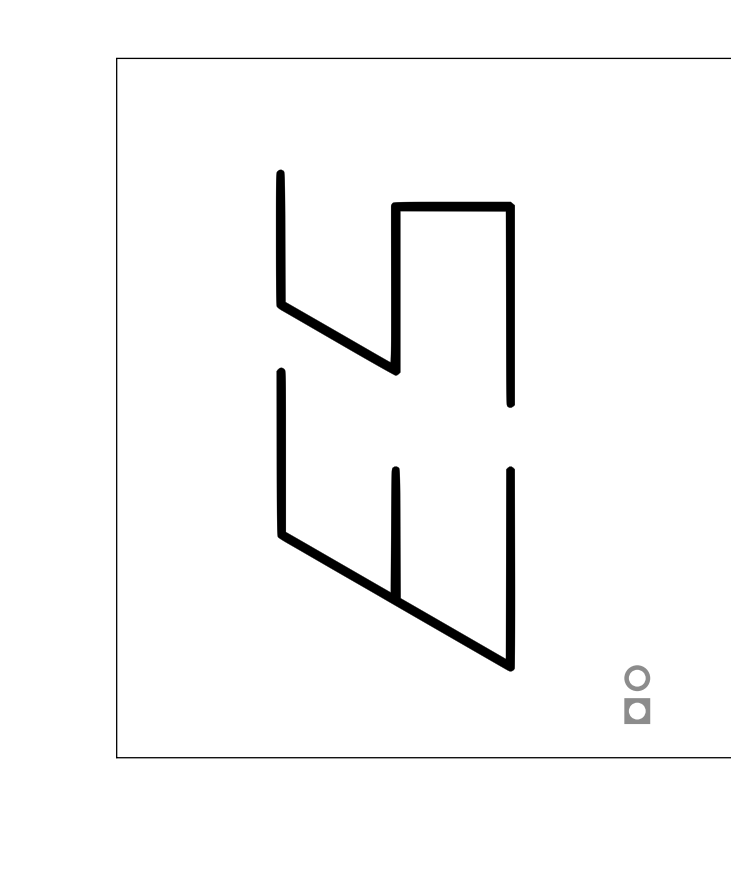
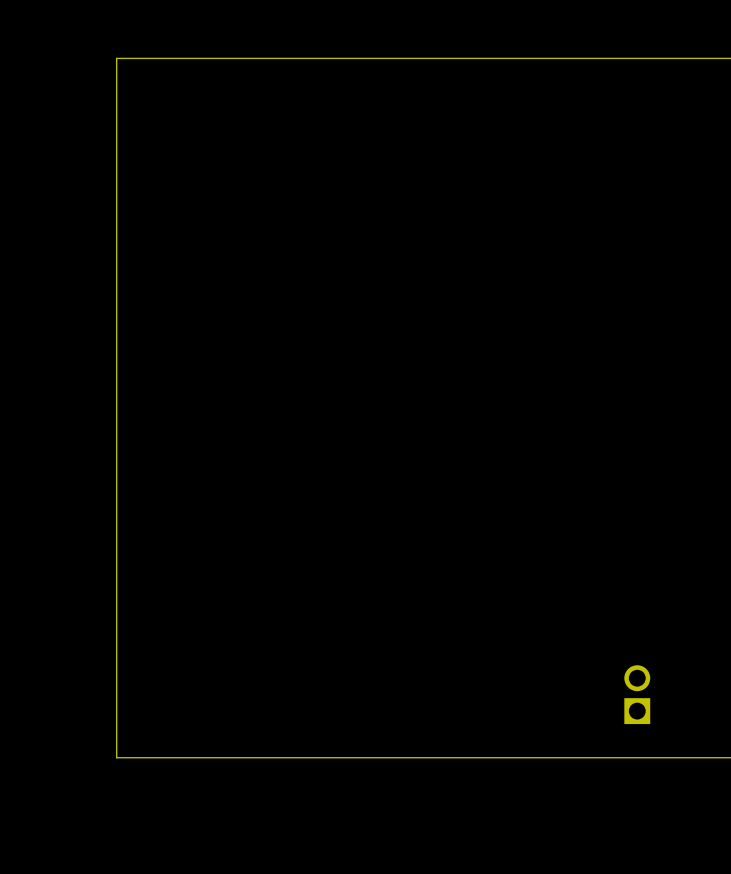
drawing: [275, 169, 516, 672] -> none

